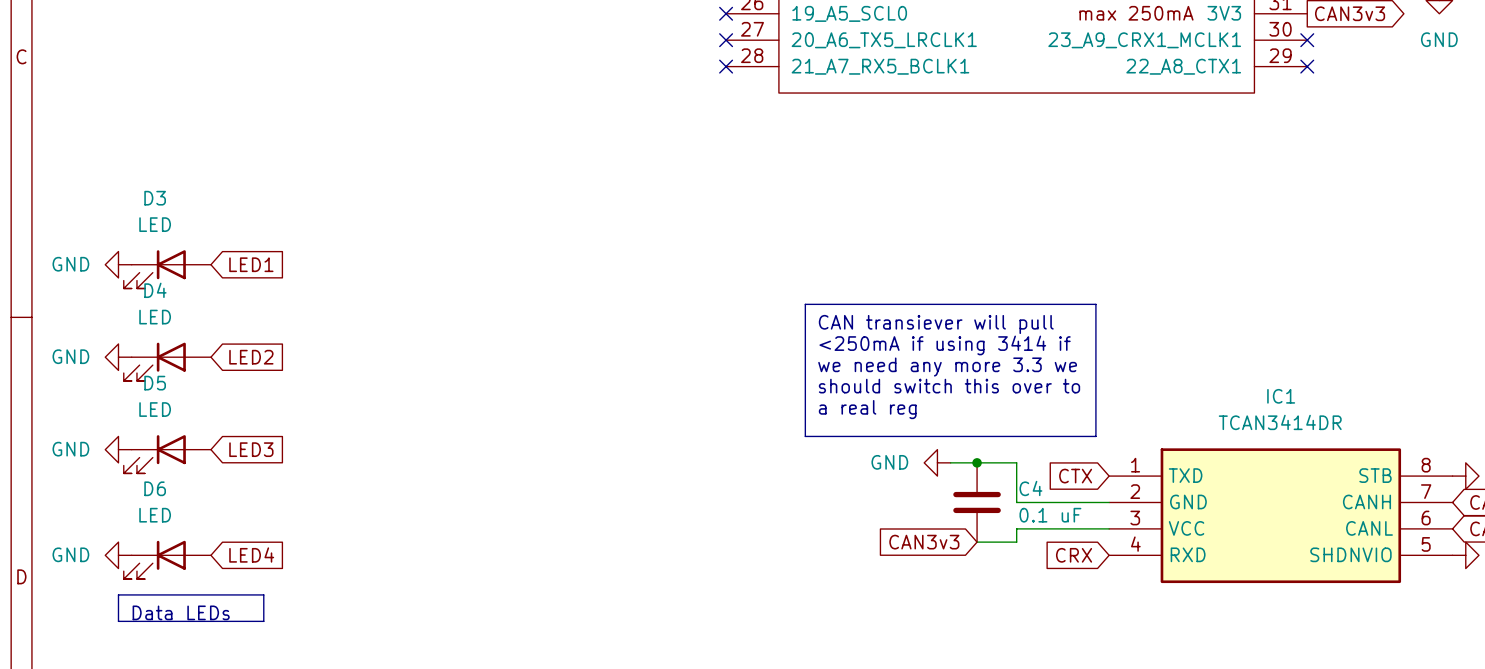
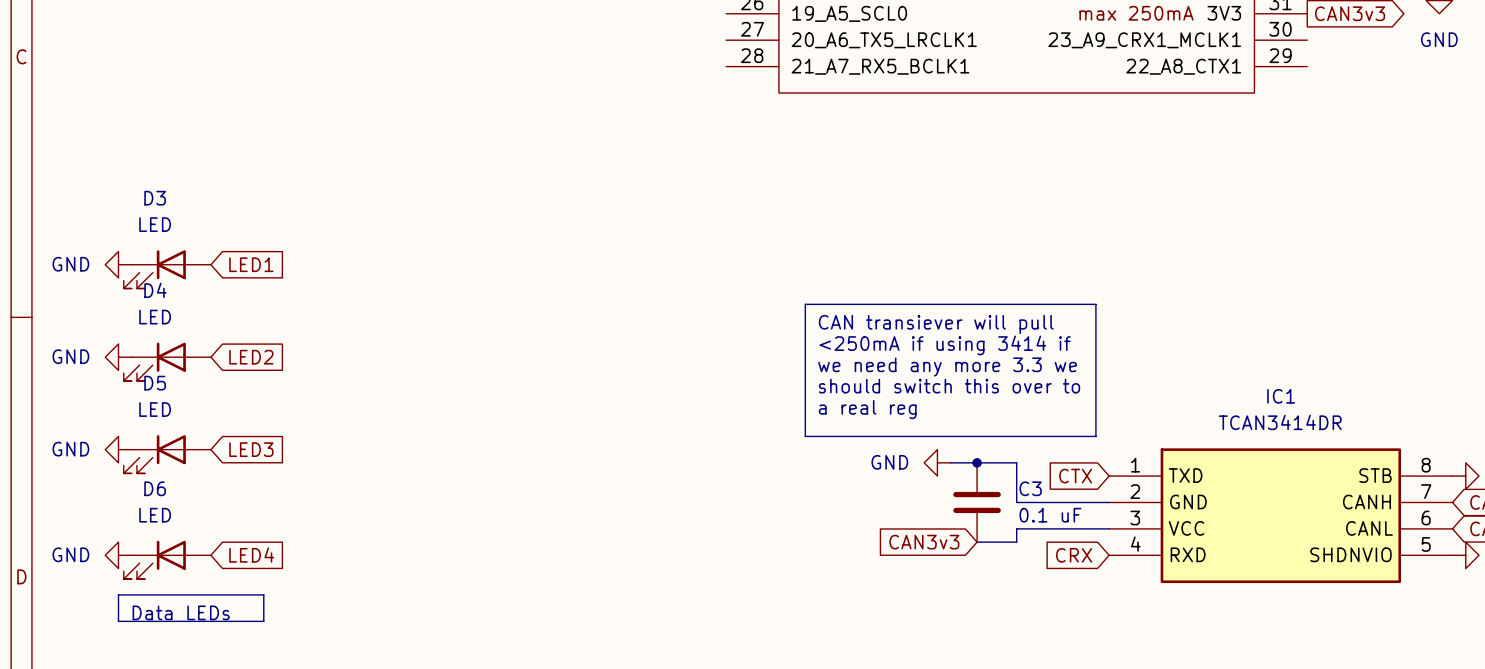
no-connect mark: (726, 13) -> none
no-connect mark: (726, 40) -> none
no-connect mark: (1307, 40) -> none
no-connect mark: (726, 66) -> none
no-connect mark: (1307, 66) -> none
C4 name: C4 (1030, 488) -> C3 (1030, 488)

